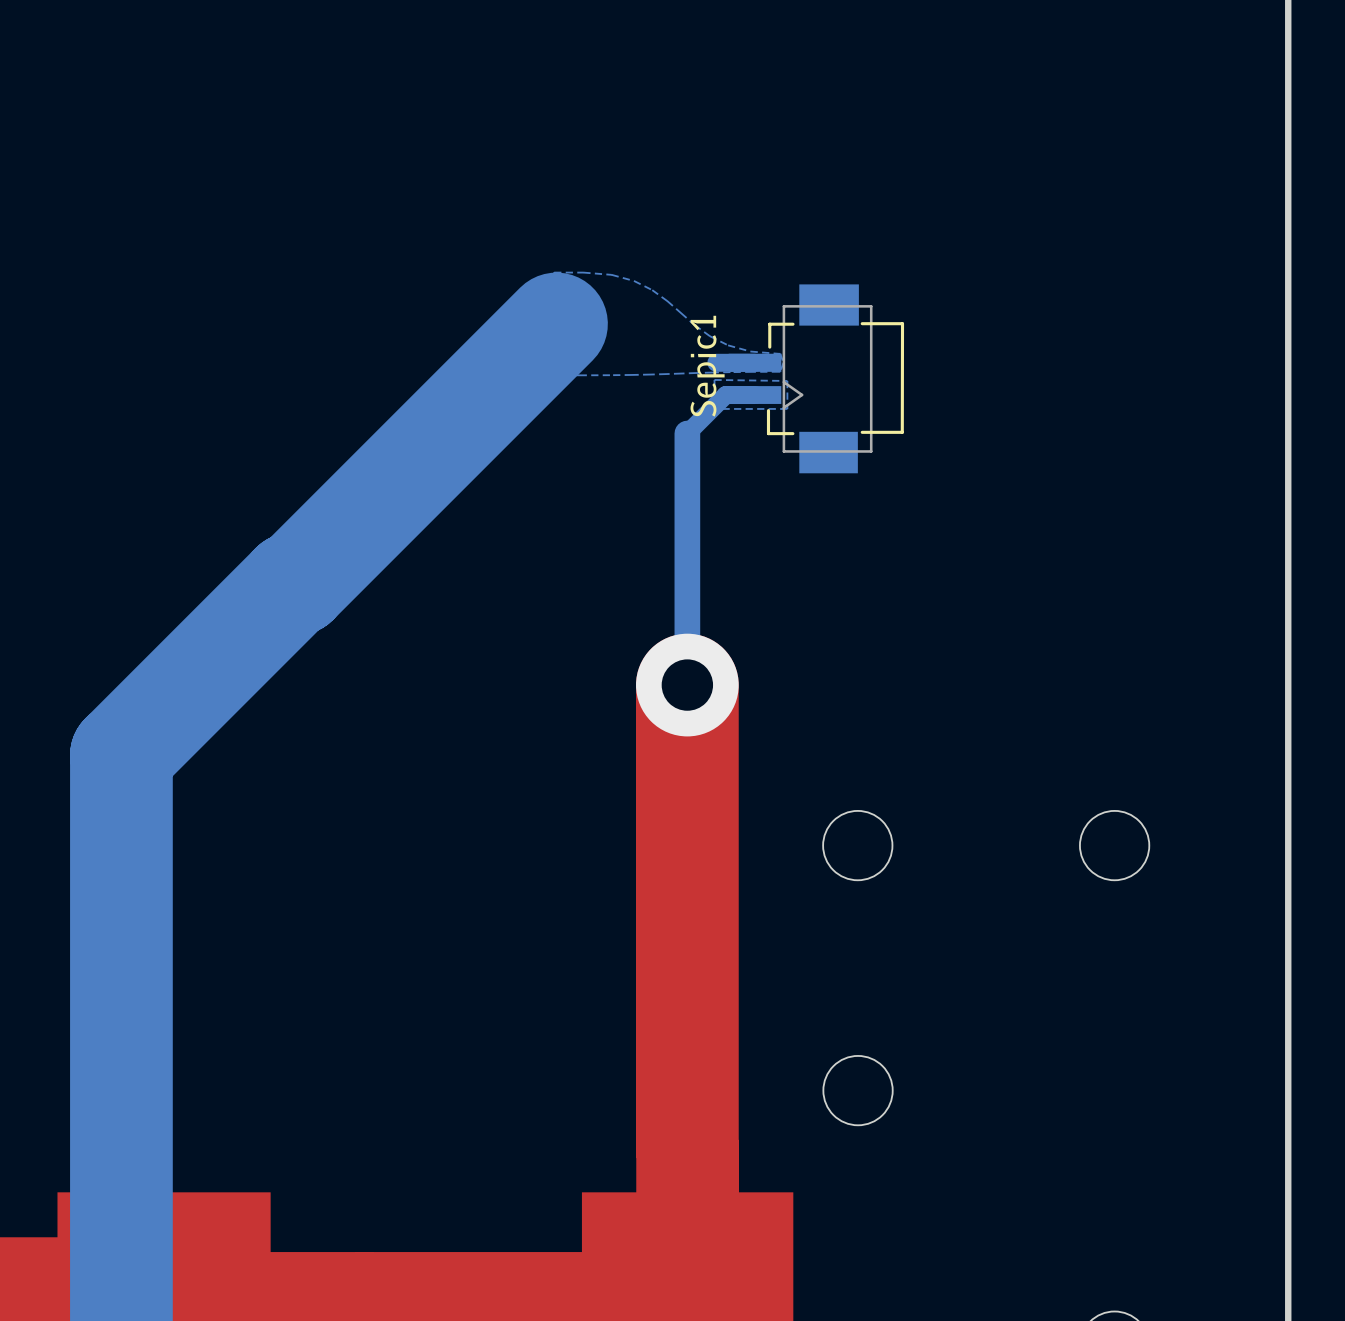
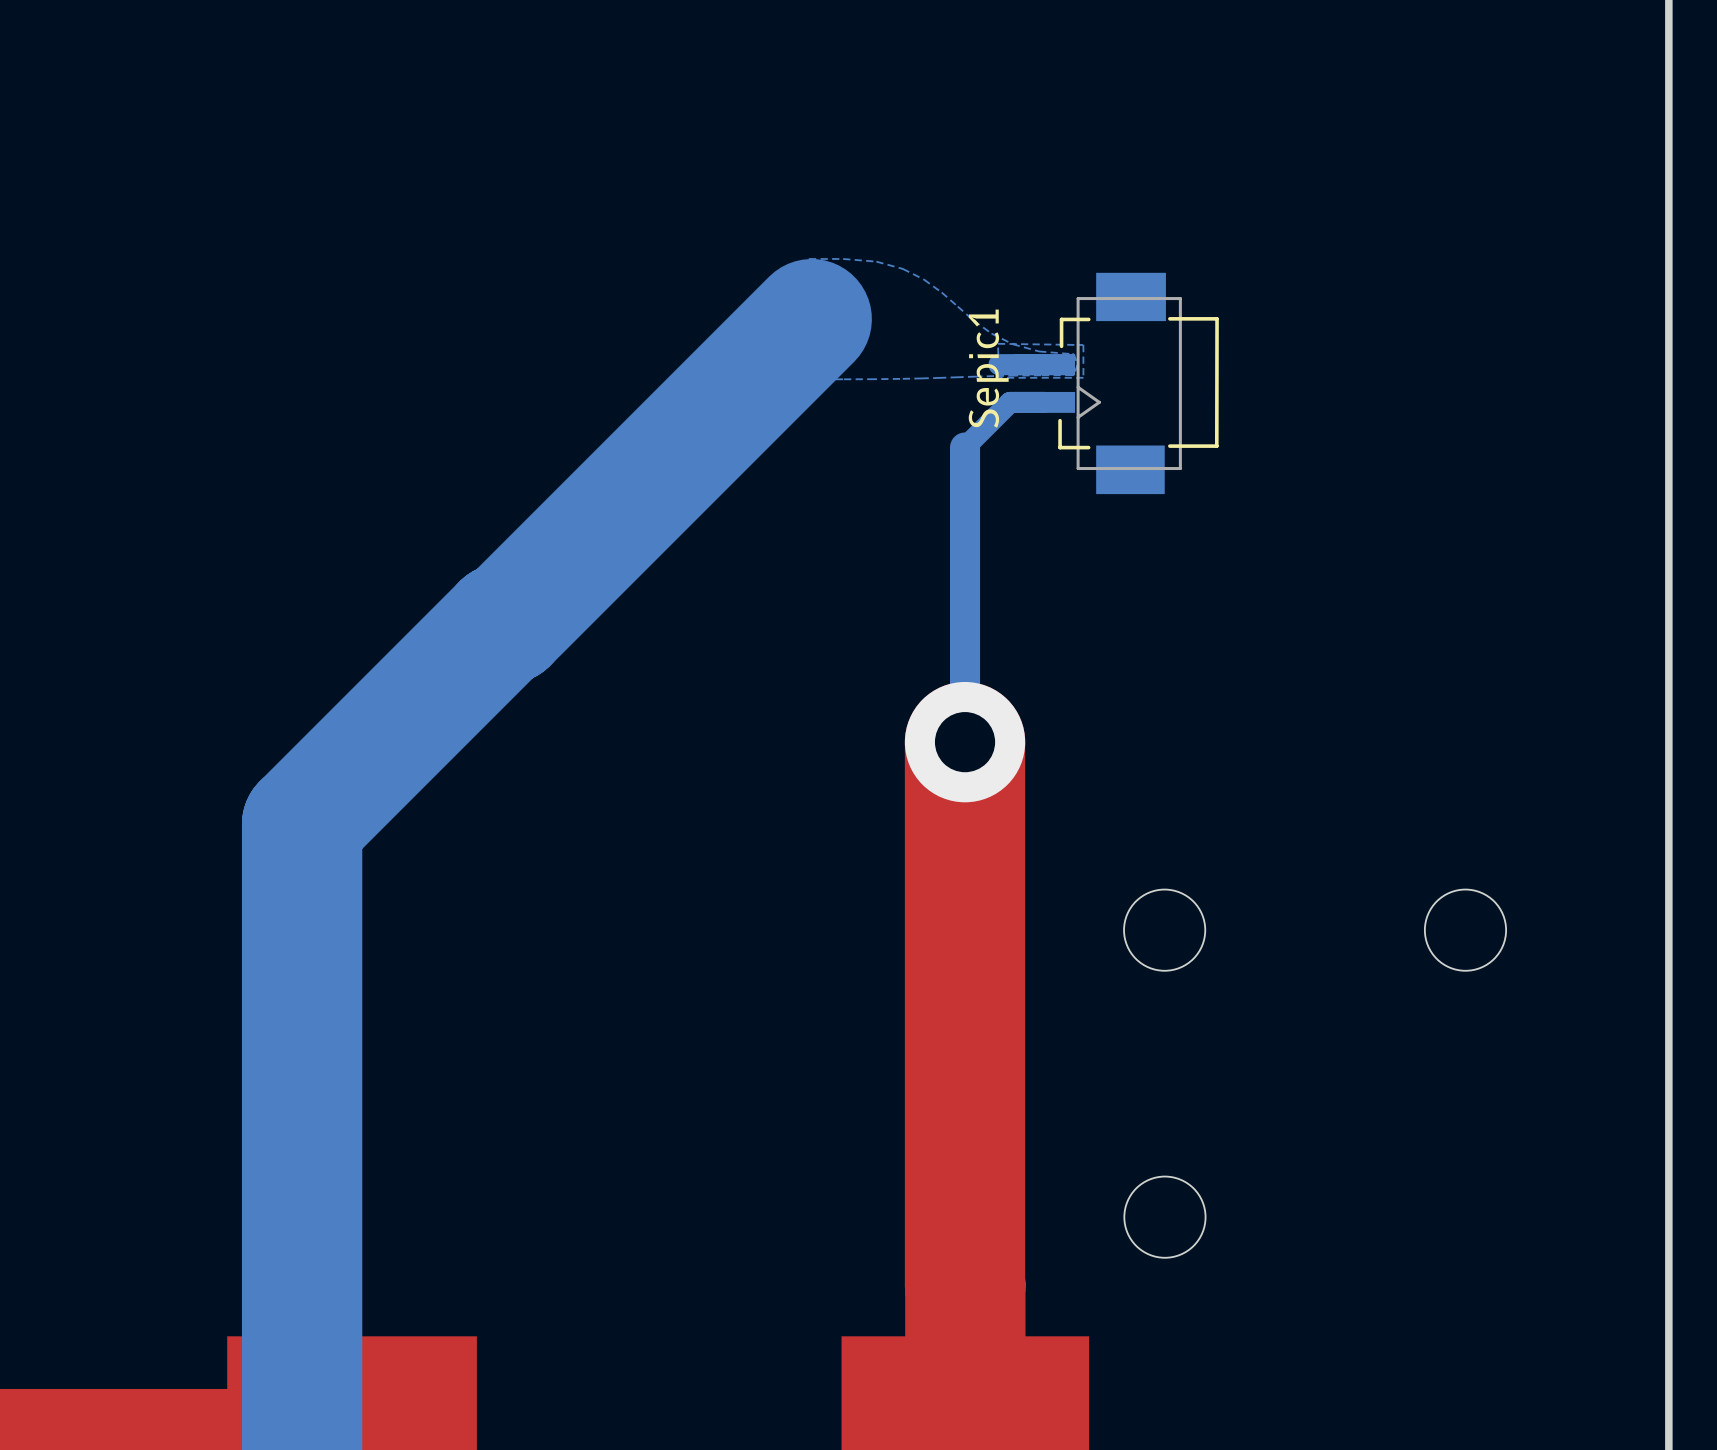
bottom zone outline: (714, 379) (715, 408) (787, 408) (787, 380) (714, 379) -> (997, 343) (999, 377) (1083, 377) (1083, 345) (997, 343)

